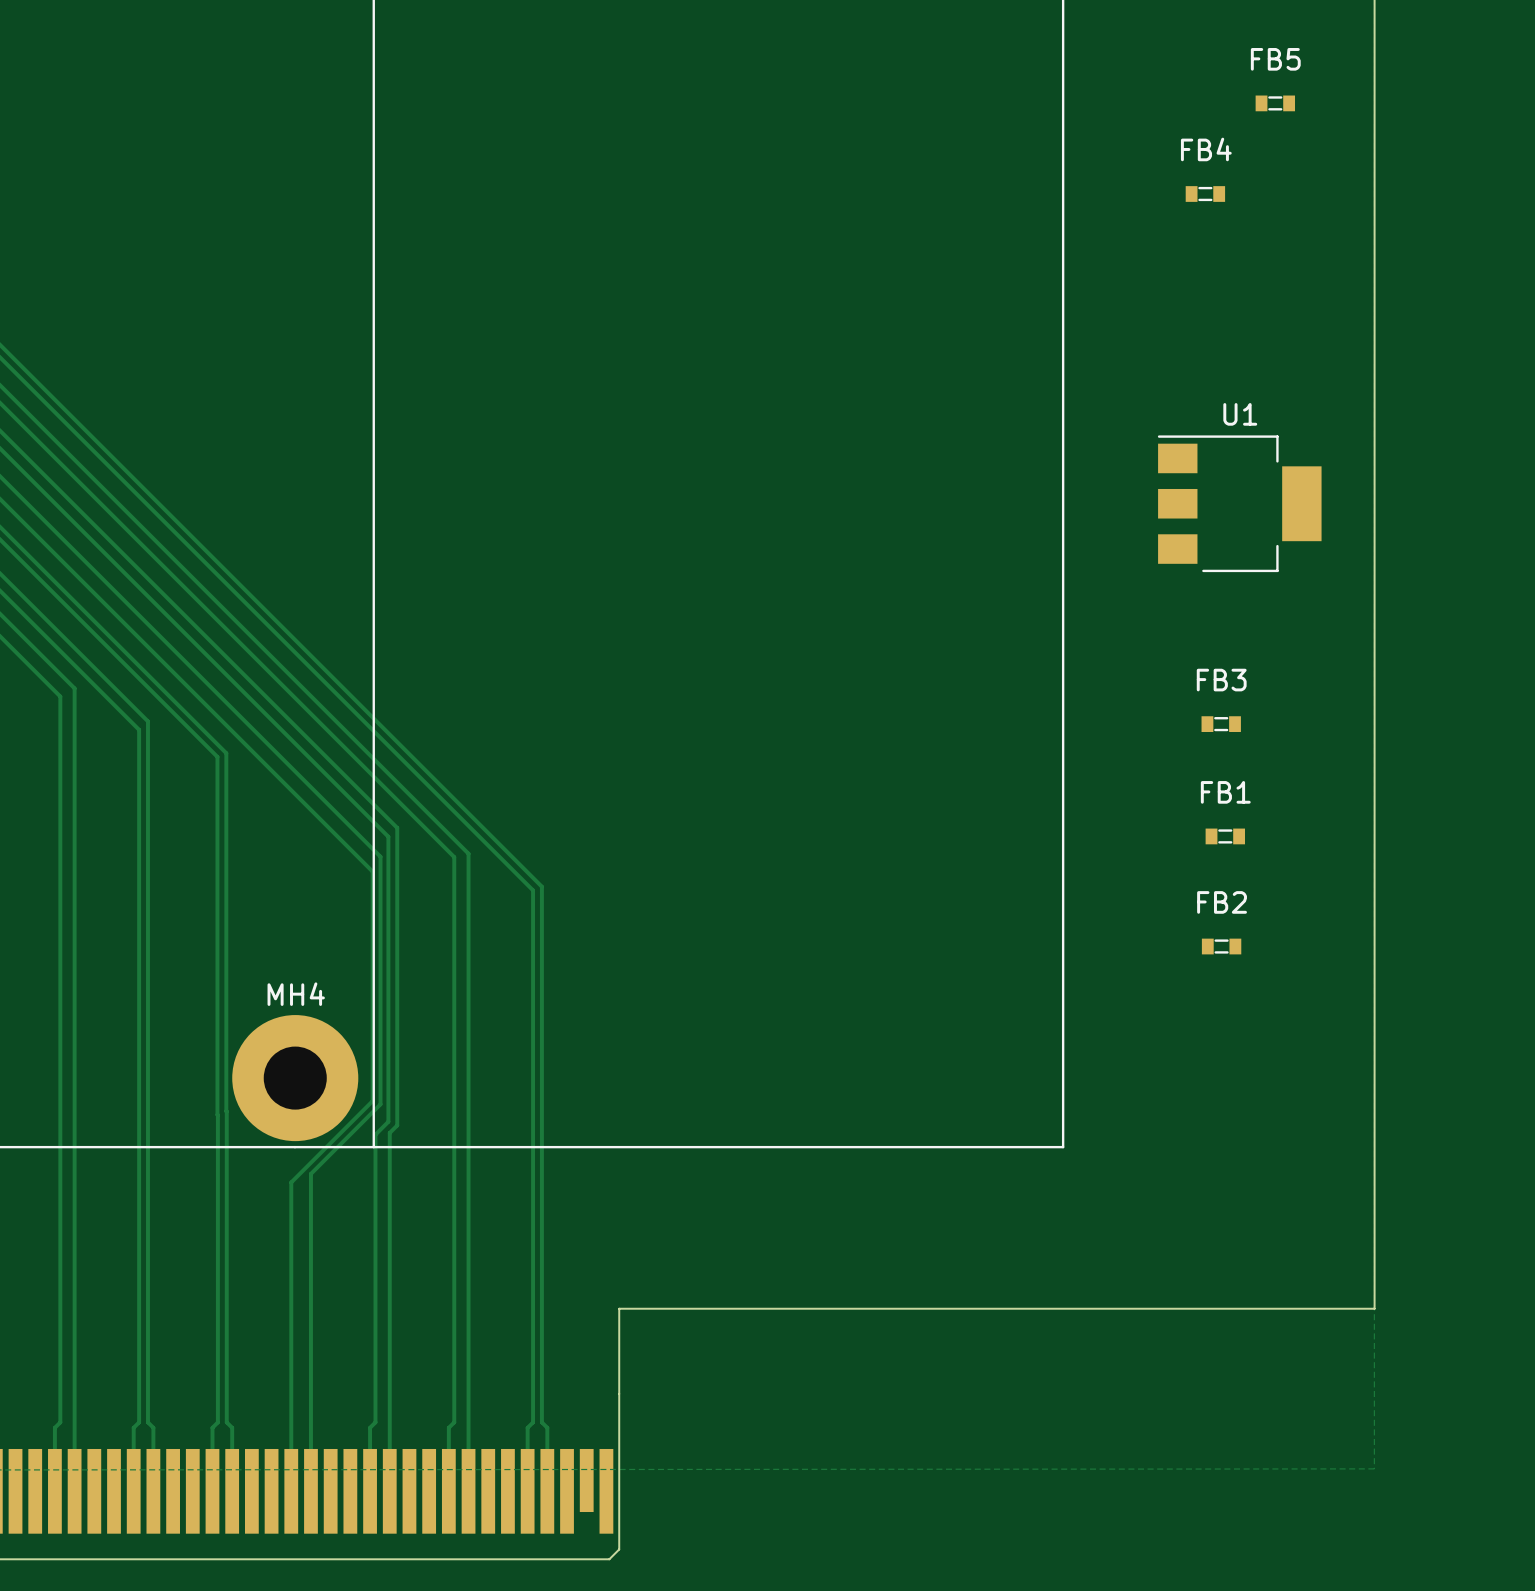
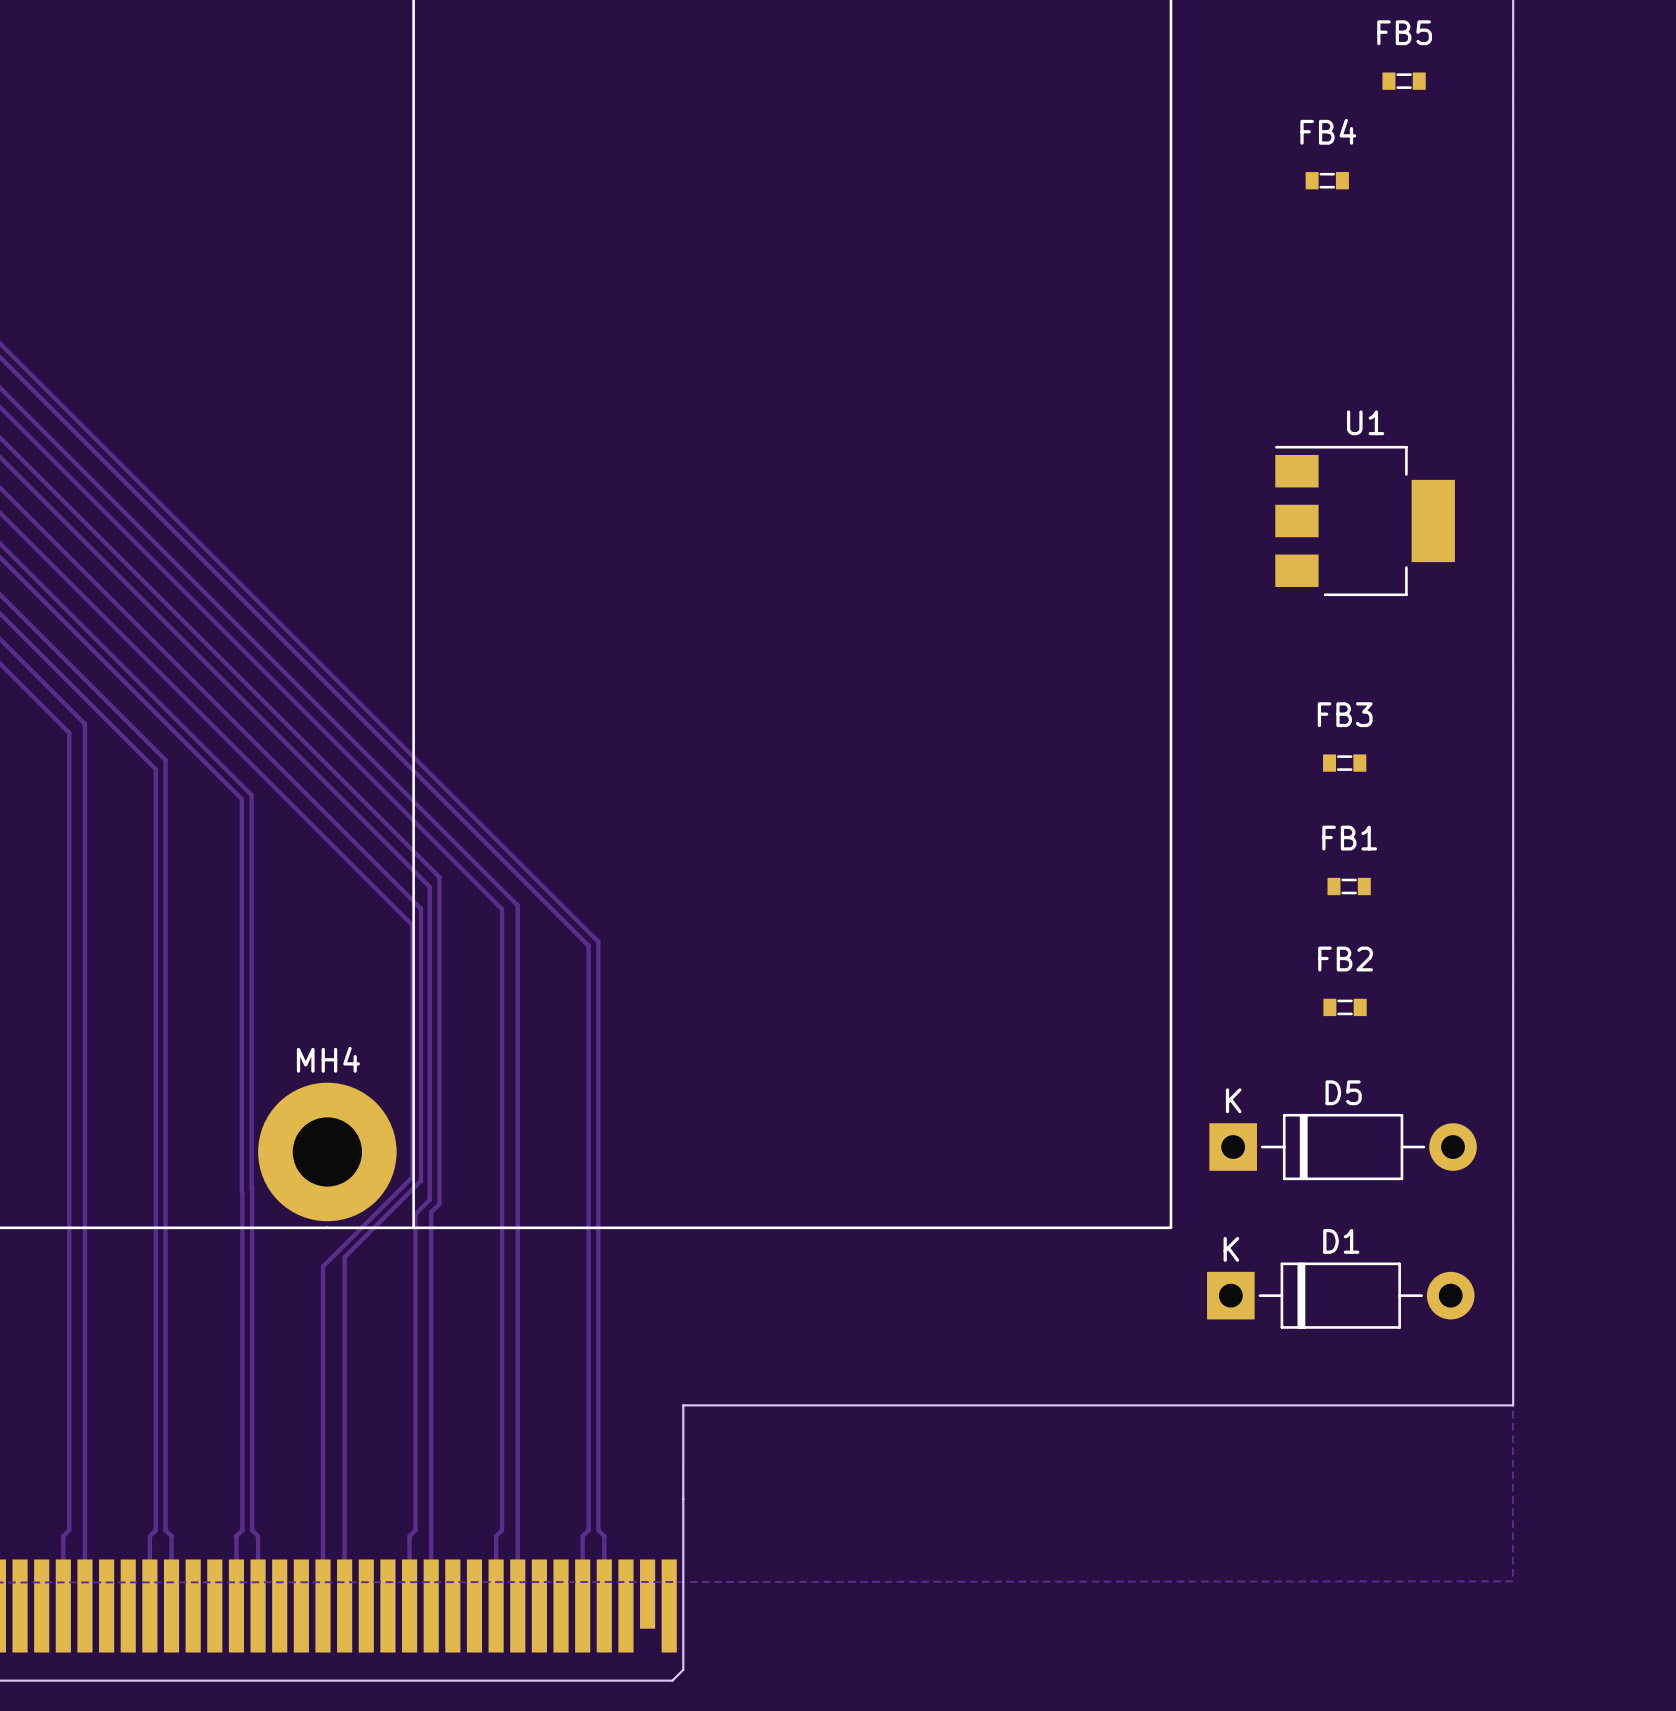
D5: none -> (1343, 1147)
D1: none -> (1340, 1295)

